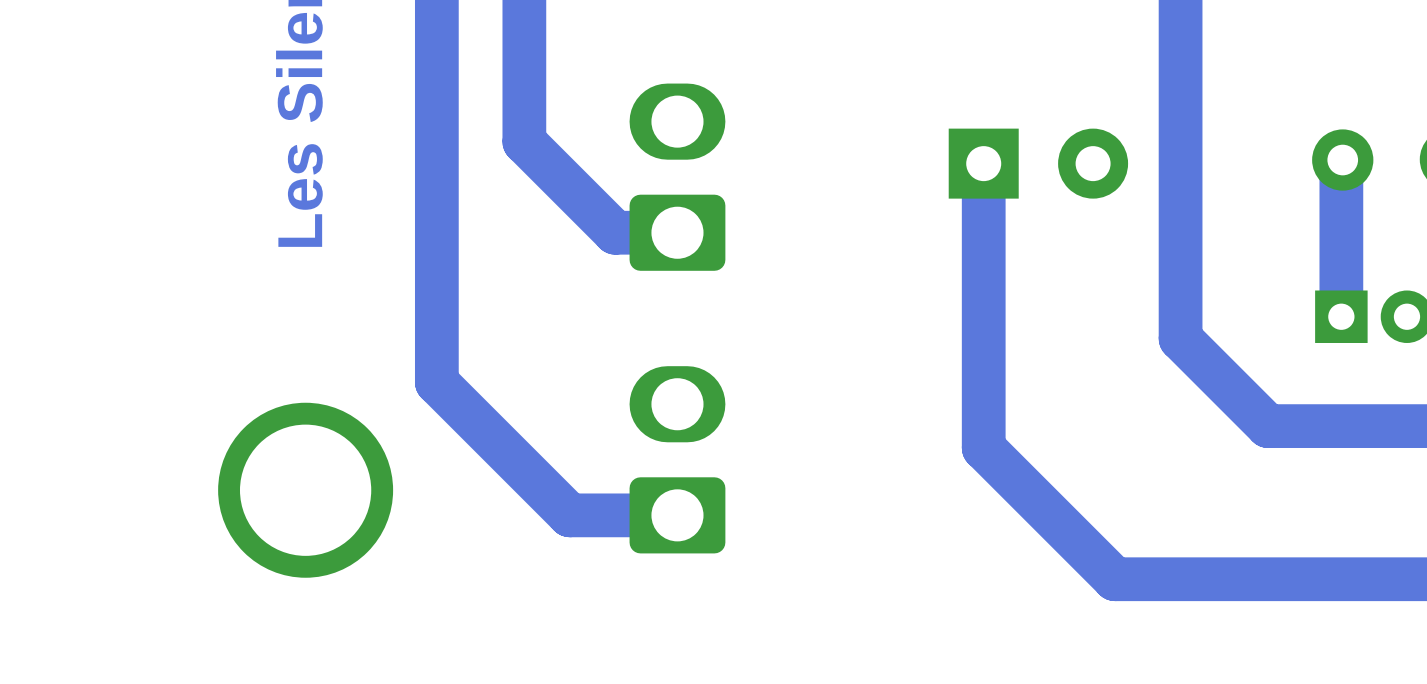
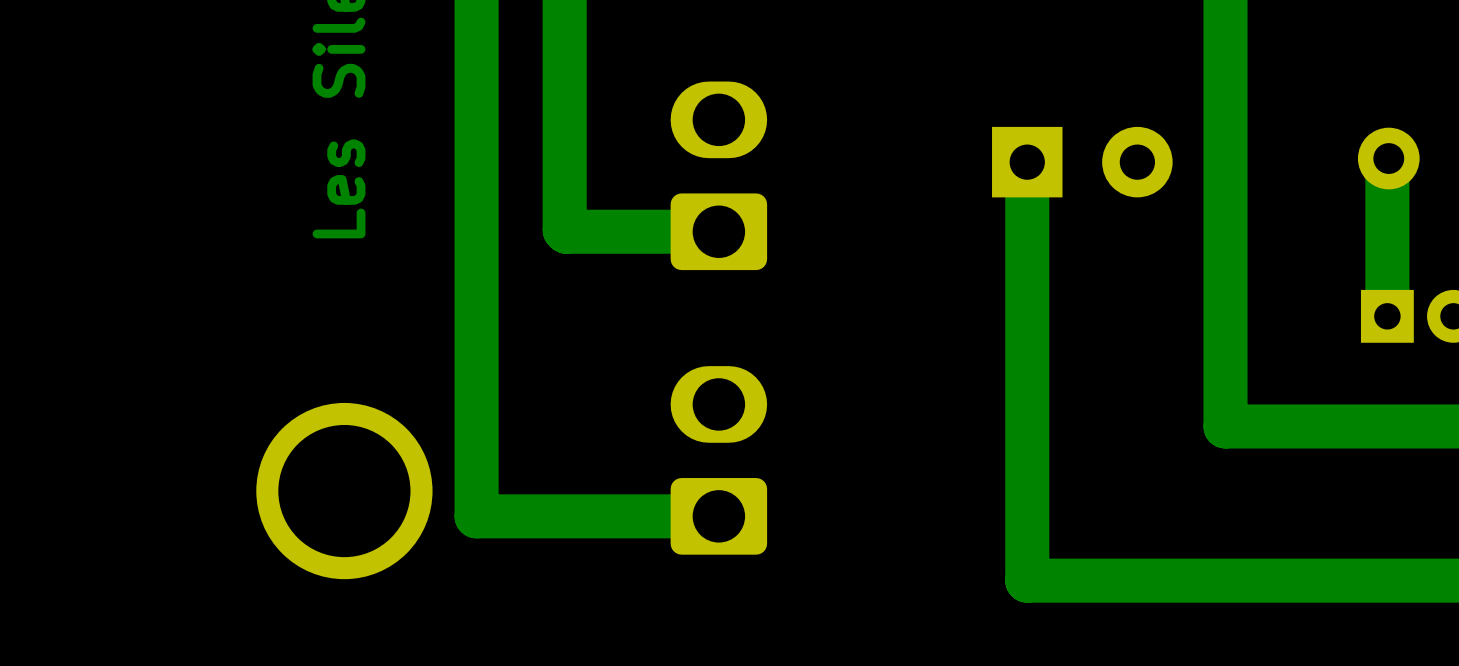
bottom track: (524, 141) (615, 232) -> (564, 140) (564, 229) (566, 231) (656, 231)
bottom track: (1180, 338) (1268, 426) -> (1225, 338) (1225, 426) (1313, 426)
bottom track: (436, 382) (569, 515) -> (476, 382) (476, 516) (610, 516)
bottom track: (983, 447) (1114, 579) -> (1027, 448) (1027, 580) (1159, 580)

